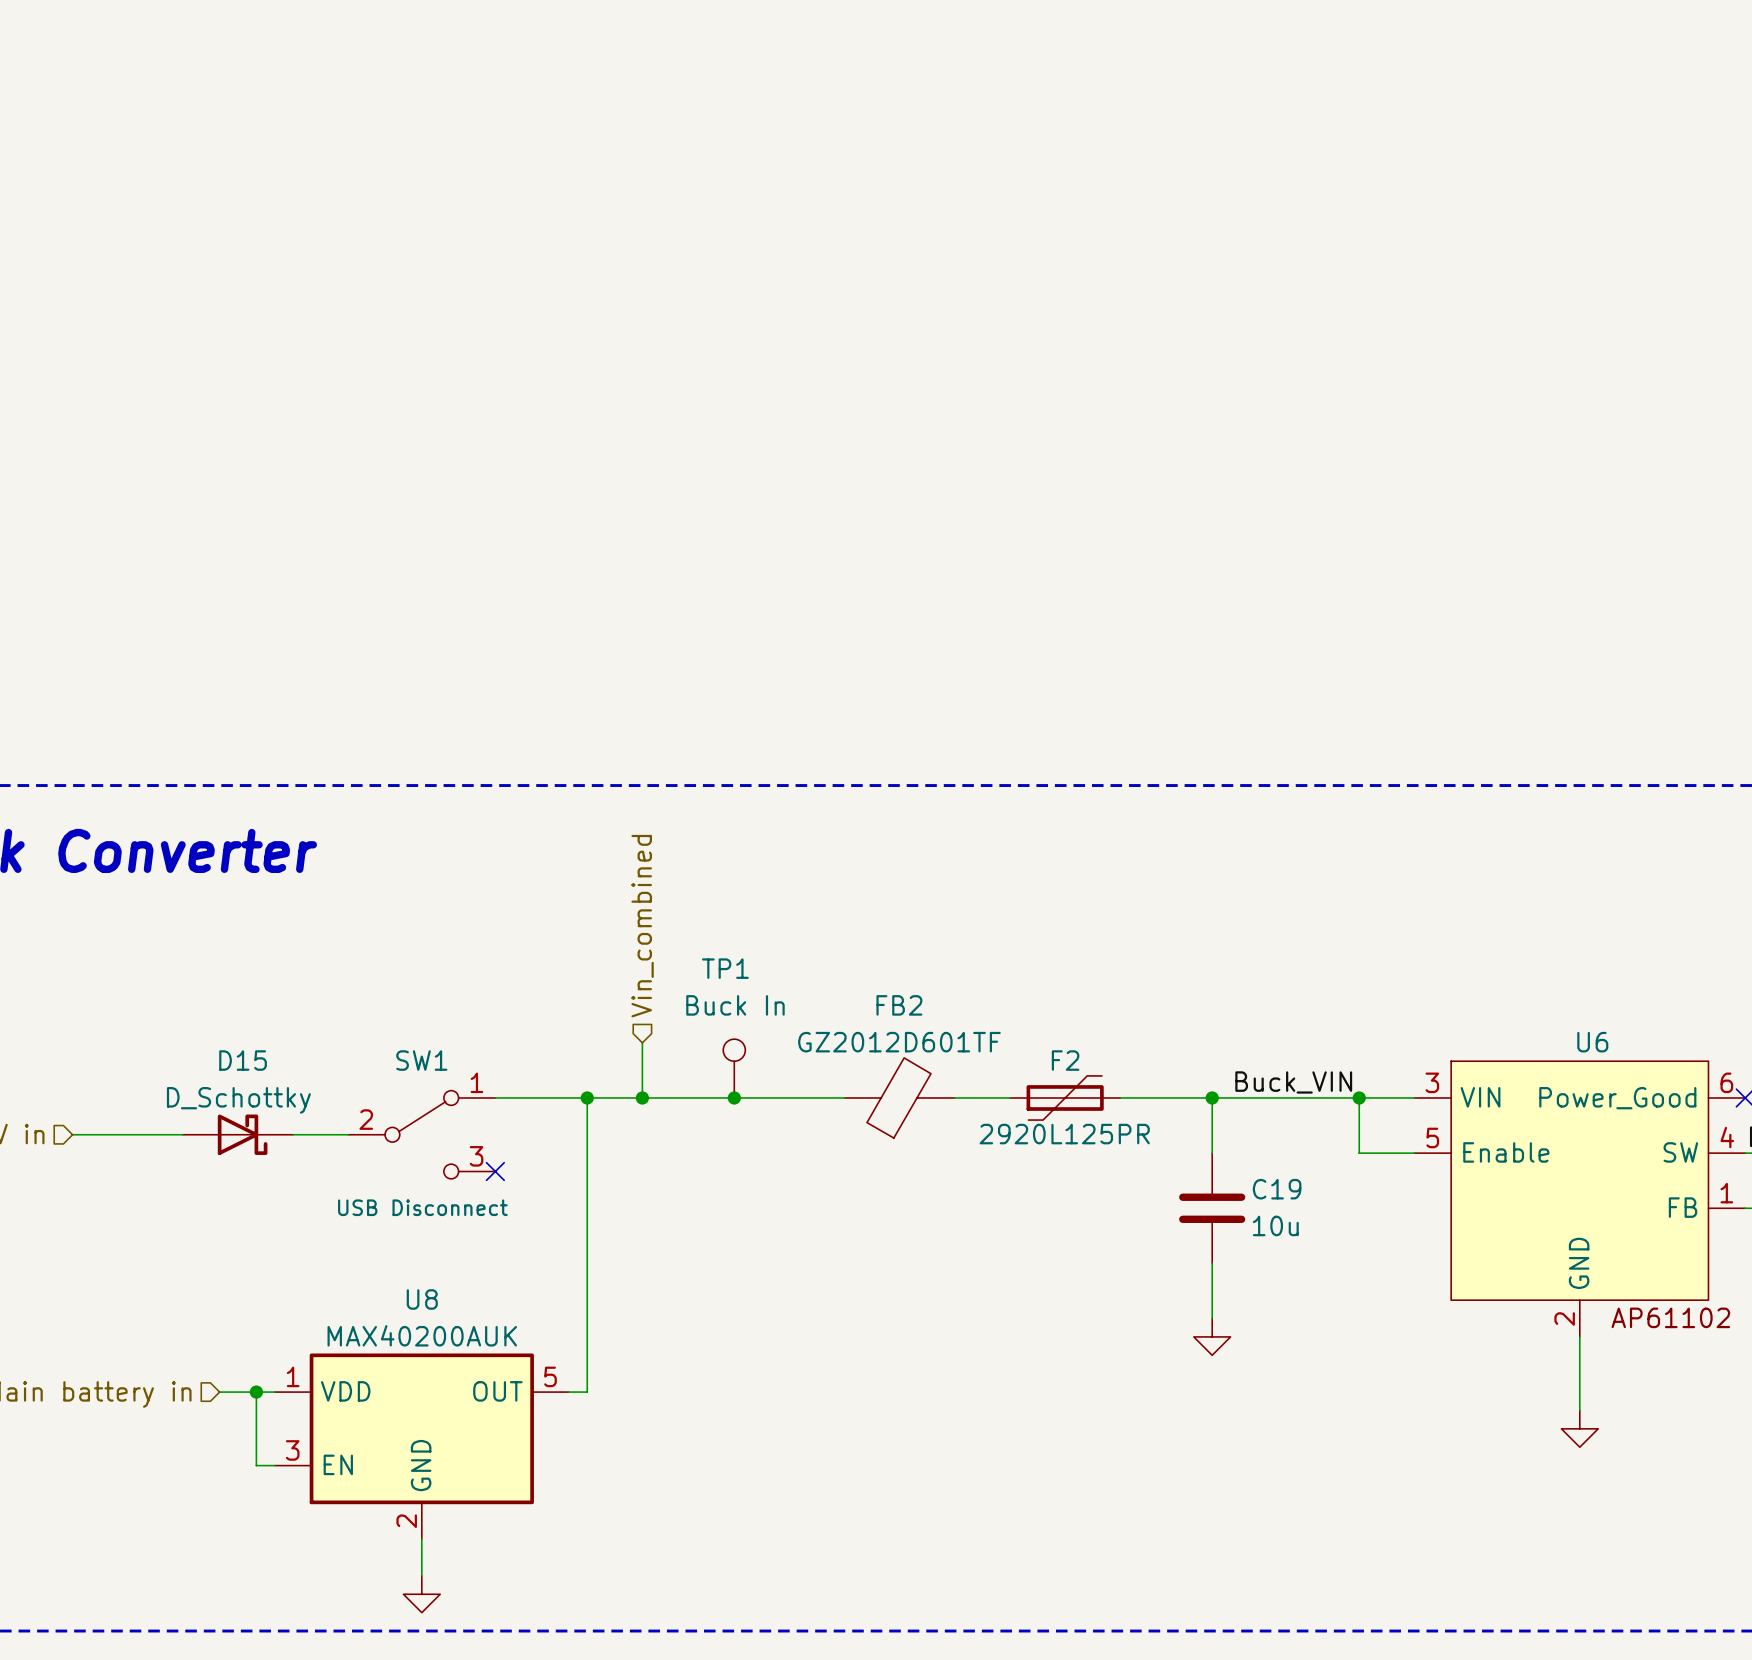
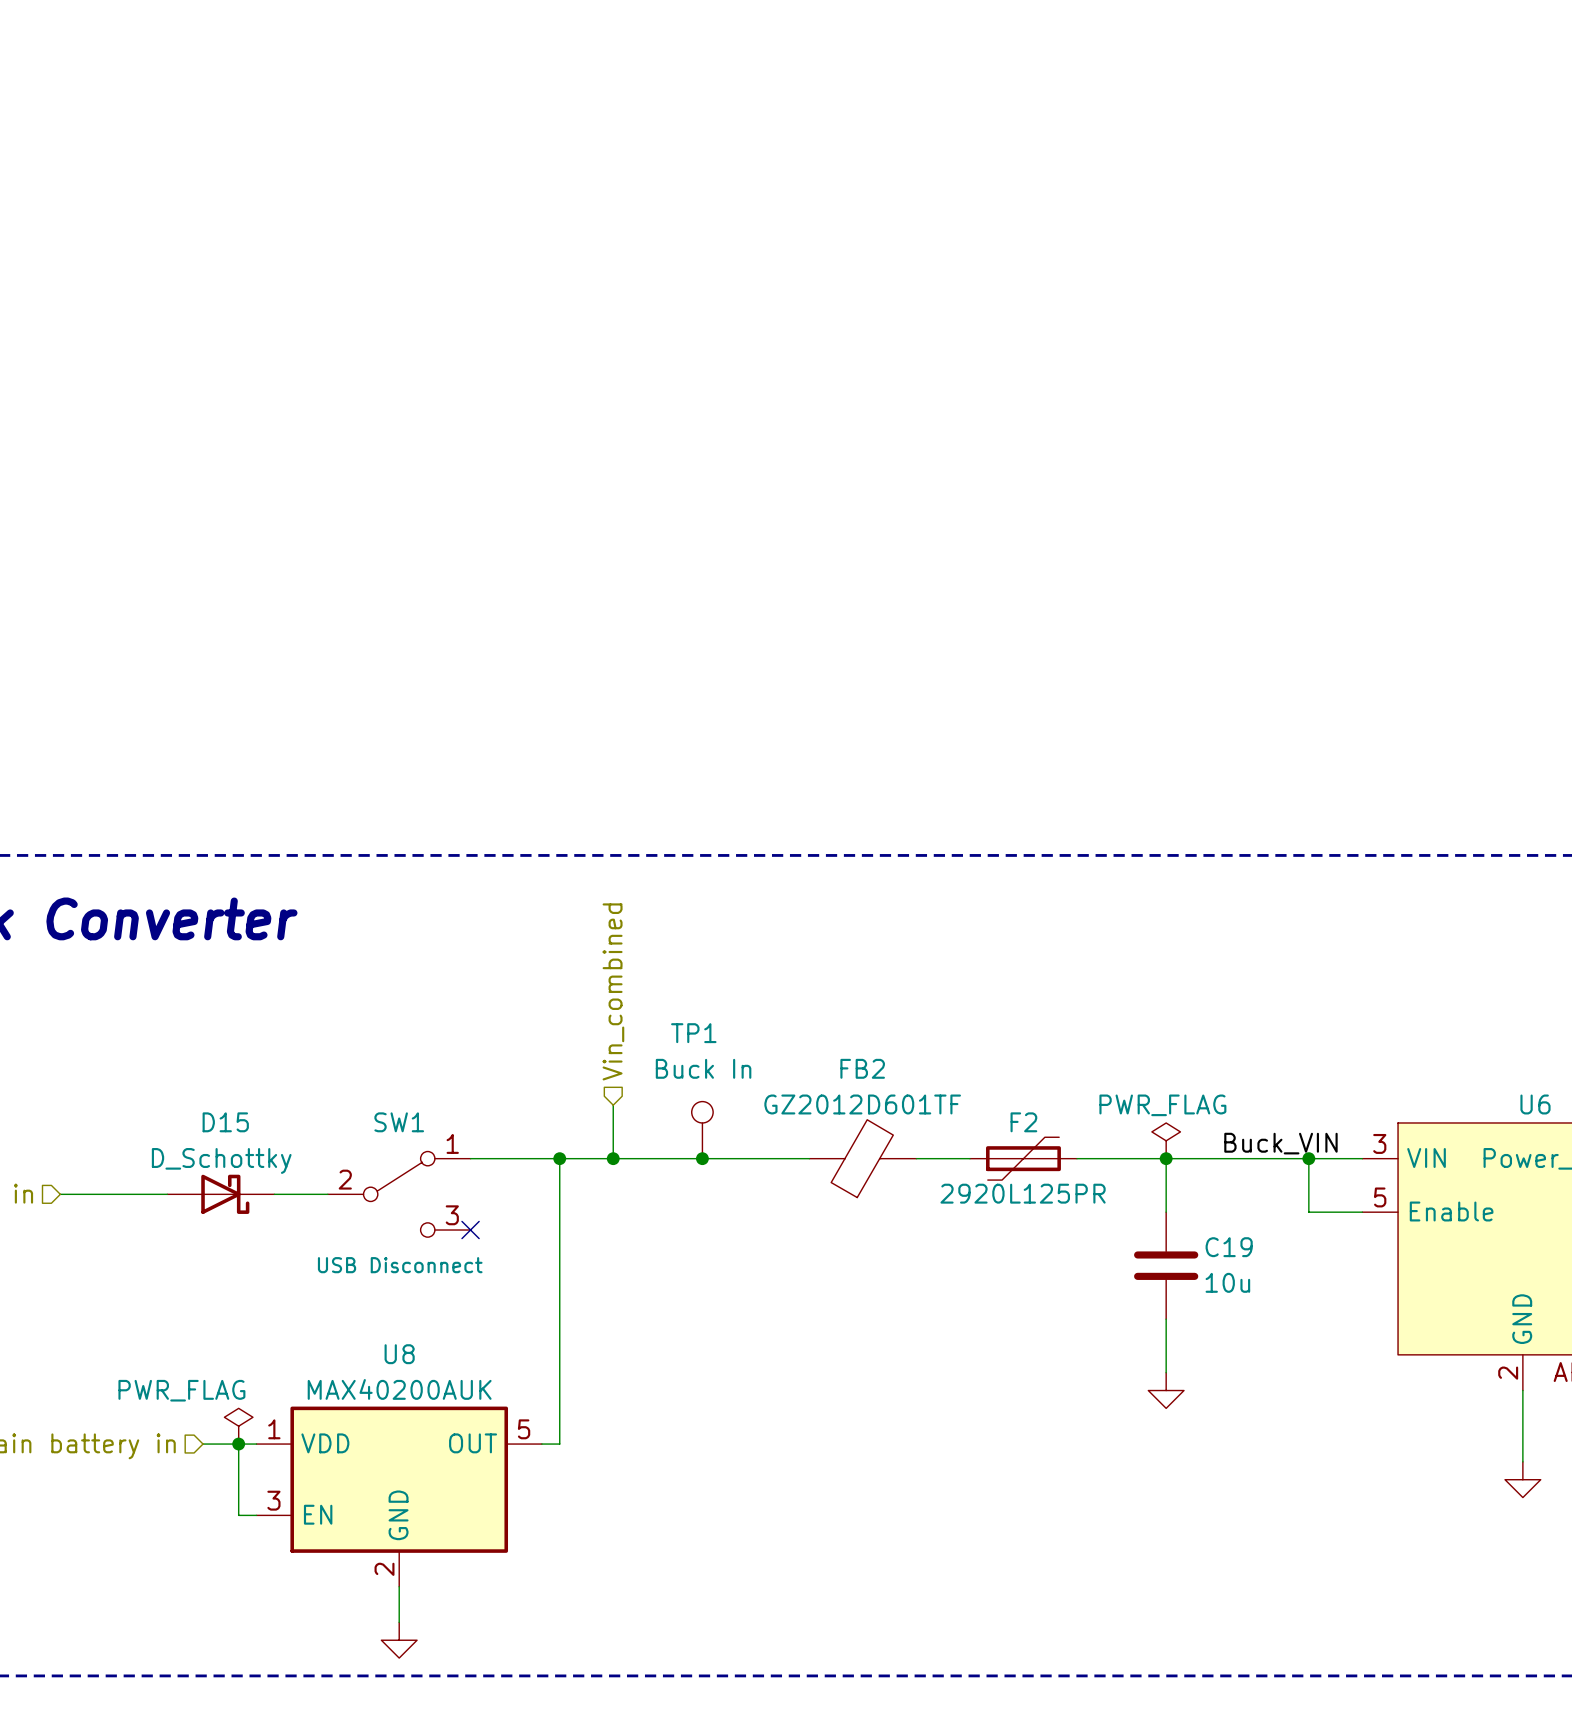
power symbol: none -> PWR_FLAG (1166, 1140)
label position: Buck_VIN (1293, 1082) -> Buck_VIN (1280, 1143)
power symbol: none -> PWR_FLAG (238, 1426)

